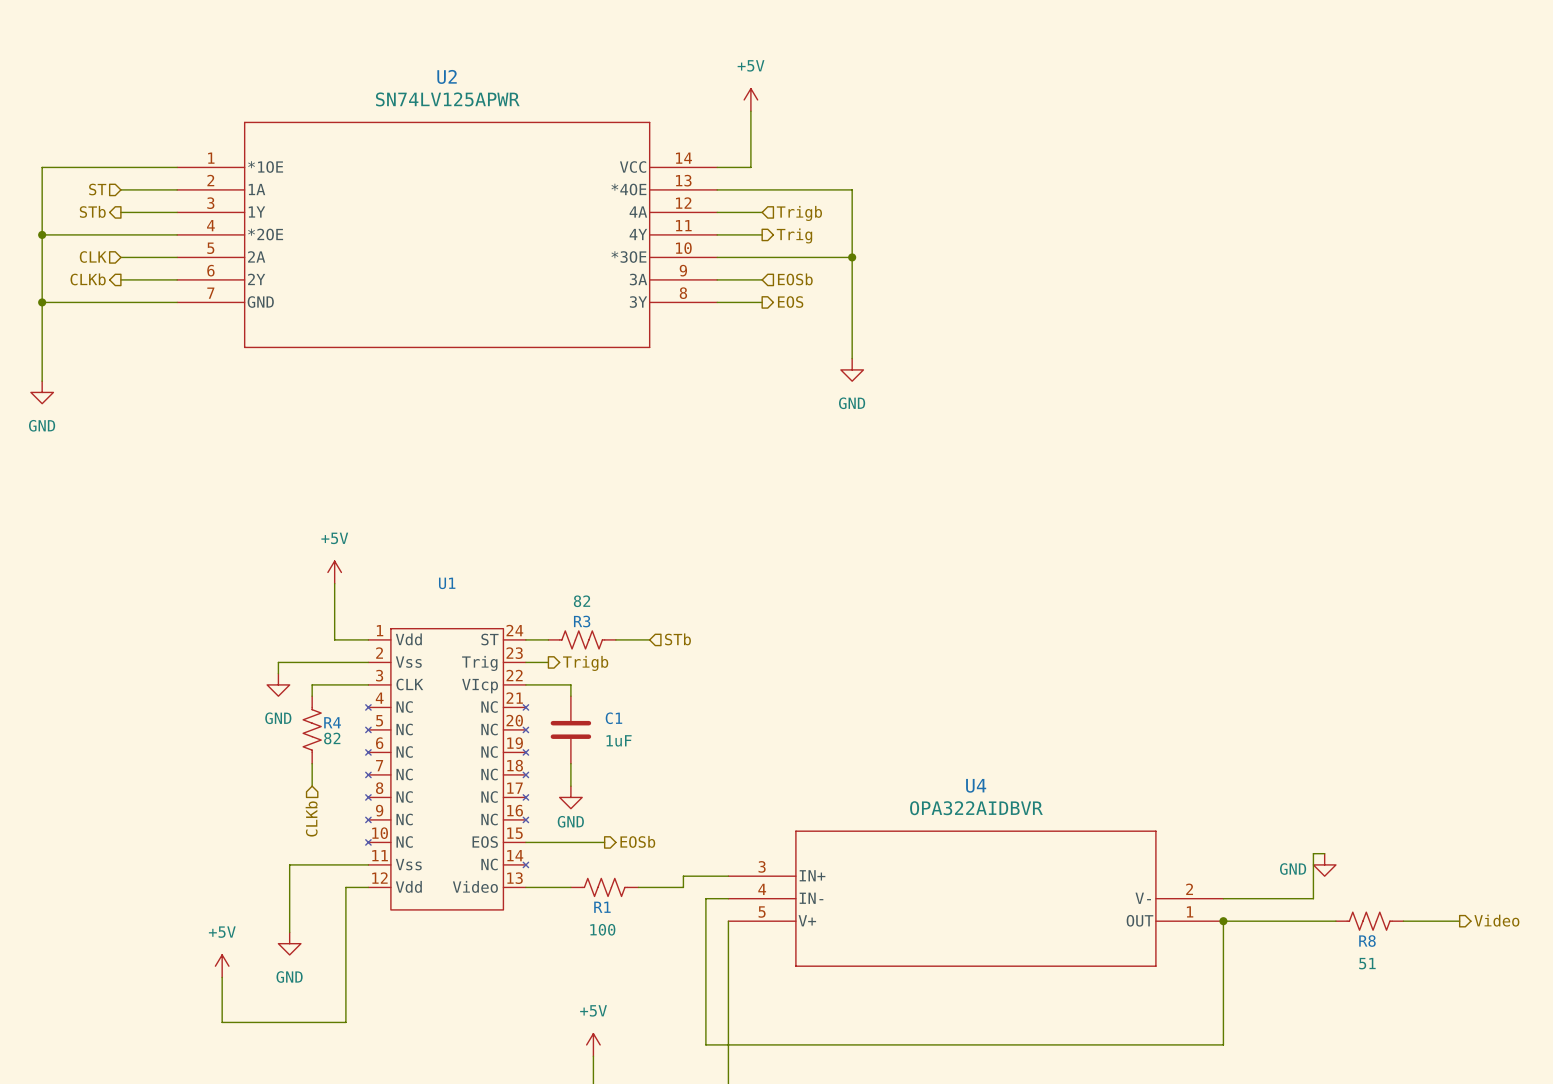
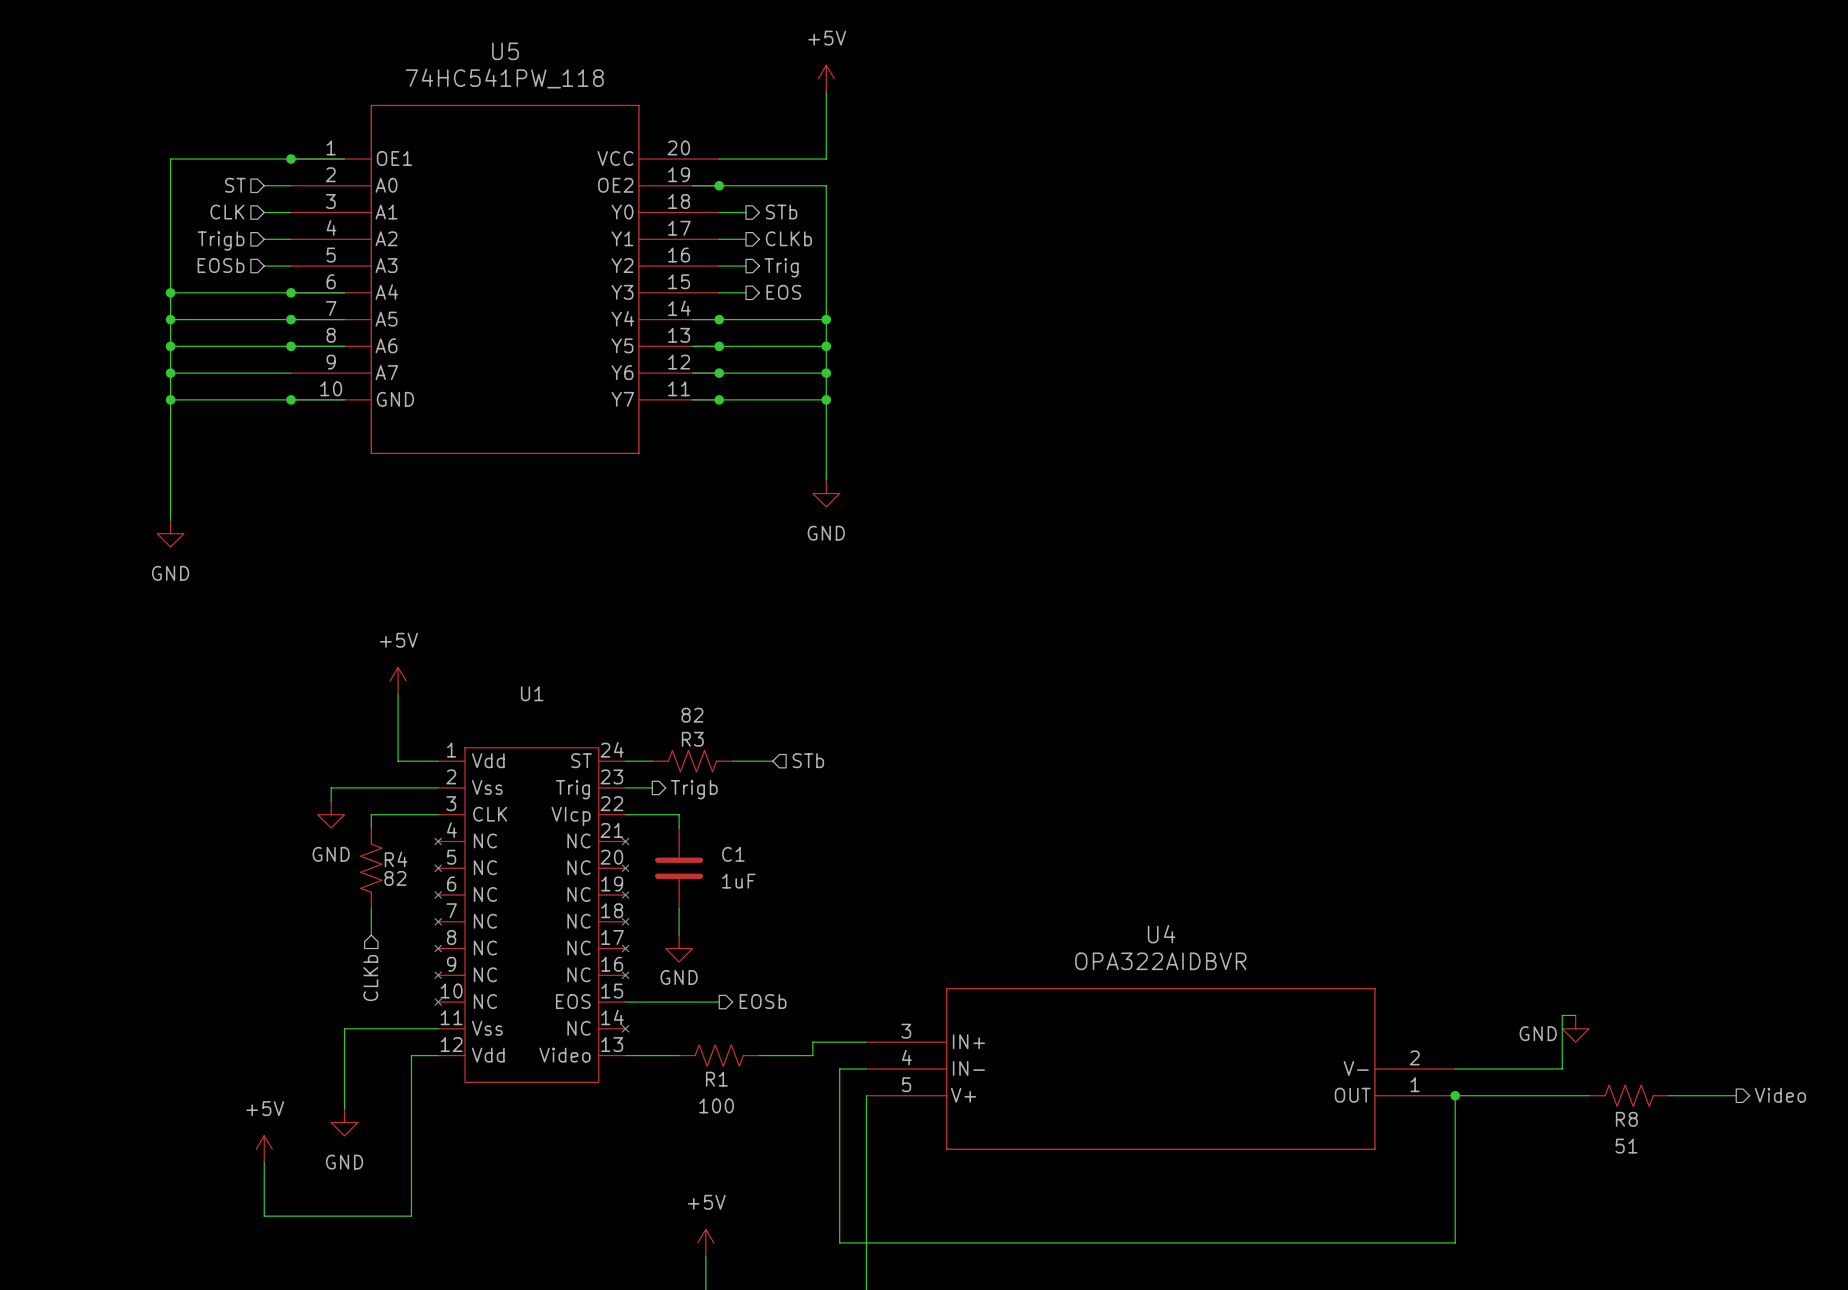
wire: none -> (826, 92) (826, 159) (719, 159)
power symbol position: +5V (750, 99) -> +5V (826, 78)
wire: (750, 111) (750, 167) (717, 167) -> none
junction: none -> (291, 159)
wire: none -> (344, 159) (170, 159) (170, 520)
wire: none -> (264, 185) (291, 185)
wire: none -> (692, 185) (826, 185) (826, 480)
junction: none -> (719, 185)
wire: (177, 167) (42, 167) (42, 381) -> none
wire: none -> (264, 212) (291, 212)
wire: none -> (719, 212) (746, 212)
hierarchical label: none -> STb (781, 212)
hierarchical label position: ST (97, 189) -> ST (235, 185)
wire: (120, 189) (177, 189) -> none
wire: (717, 189) (852, 189) (852, 358) -> none
hierarchical label: none -> CLKb (788, 238)
wire: none -> (264, 239) (291, 239)
wire: none -> (719, 239) (746, 239)
hierarchical label: none -> Trigb (221, 241)
hierarchical label: STb (92, 211) -> none
wire: (120, 212) (177, 212) -> none
wire: (717, 212) (762, 212) -> none
hierarchical label: Trigb (799, 213) -> none
hierarchical label: none -> EOSb (221, 265)
wire: none -> (264, 266) (291, 266)
wire: none -> (719, 266) (746, 266)
wire: (42, 234) (177, 234) -> none
junction: (42, 234) -> none
U5: none -> 74HC541PW_118 (505, 279)
U2: SN74LV125APWR (447, 234) -> none
wire: (717, 234) (762, 234) -> none
hierarchical label position: Trig (794, 235) -> Trig (781, 267)
wire: none -> (170, 292) (344, 292)
junction: none -> (170, 292)
junction: none -> (291, 292)
wire: none -> (719, 292) (746, 292)
hierarchical label position: CLK (93, 257) -> CLK (227, 212)
wire: (120, 257) (177, 257) -> none
wire: (717, 257) (852, 257) -> none
junction: (852, 257) -> none
wire: none -> (170, 319) (344, 319)
junction: none -> (170, 319)
junction: none -> (291, 319)
wire: none -> (692, 319) (826, 319)
junction: none -> (719, 319)
junction: none -> (826, 319)
hierarchical label: CLKb (88, 279) -> none
wire: (120, 279) (177, 279) -> none
wire: (717, 279) (762, 279) -> none
hierarchical label: EOSb (795, 279) -> none
wire: none -> (170, 346) (344, 346)
junction: none -> (170, 346)
junction: none -> (291, 346)
wire: none -> (692, 346) (826, 346)
junction: none -> (719, 346)
junction: none -> (826, 346)
wire: (42, 302) (177, 302) -> none
junction: (42, 302) -> none
wire: (717, 302) (762, 302) -> none
hierarchical label position: EOS (790, 302) -> EOS (783, 292)
wire: none -> (170, 373) (291, 373)
junction: none -> (170, 373)
wire: none -> (692, 373) (826, 373)
junction: none -> (719, 373)
junction: none -> (826, 373)
wire: none -> (170, 399) (344, 399)
junction: none -> (170, 399)
junction: none -> (291, 399)
wire: none -> (692, 399) (826, 399)
junction: none -> (719, 399)
junction: none -> (826, 399)
power symbol position: GND (852, 369) -> GND (826, 493)
power symbol position: GND (42, 392) -> GND (170, 533)

